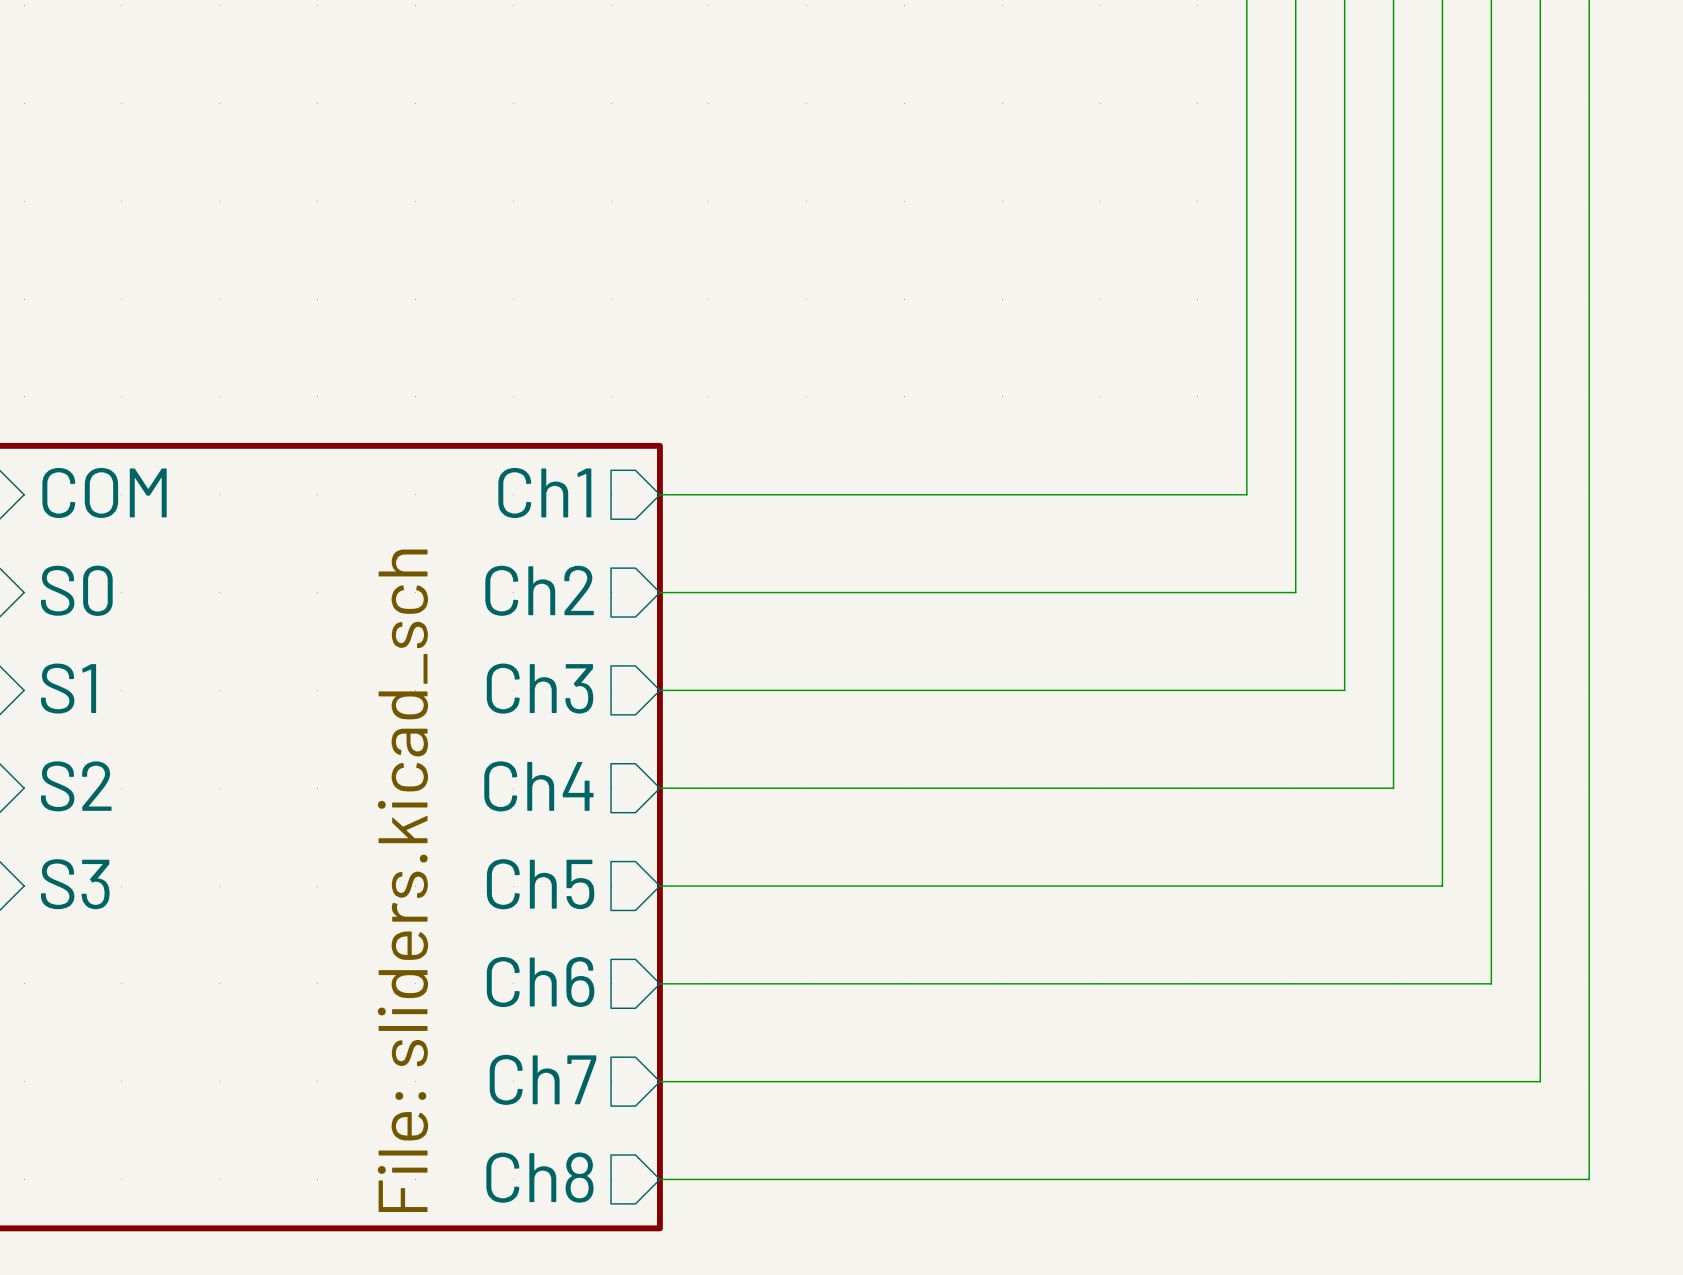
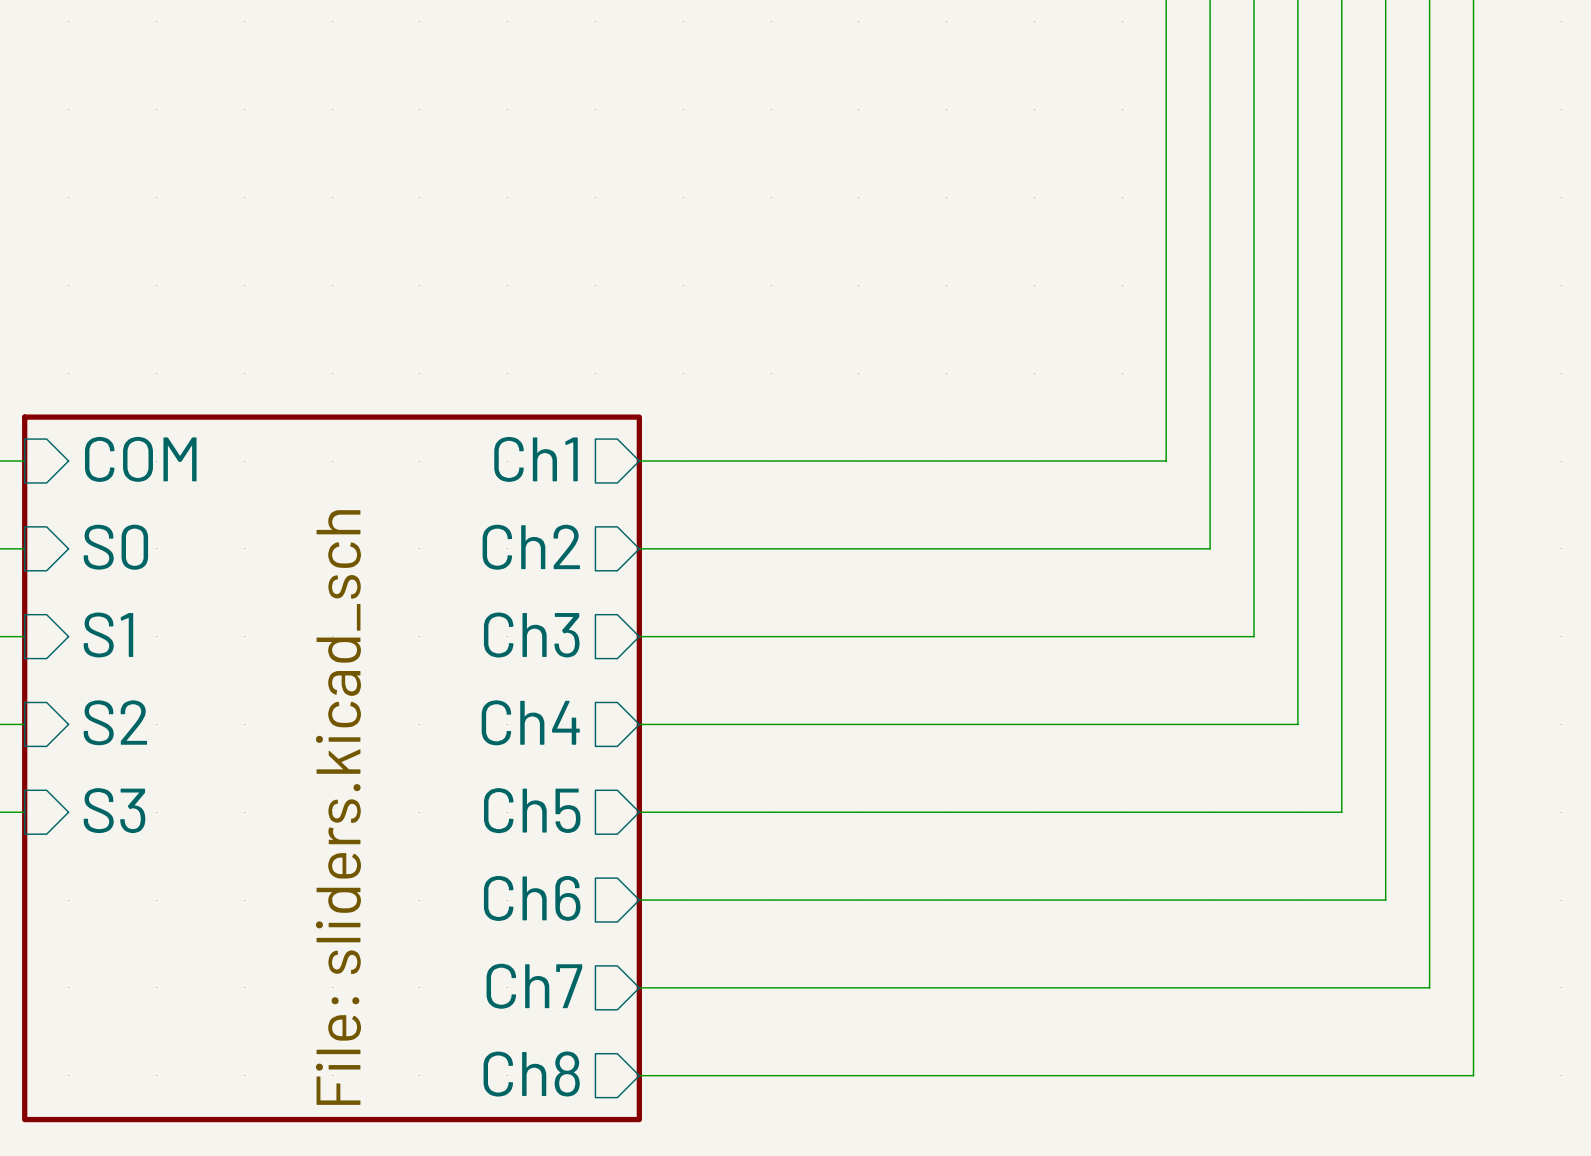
sheet value position: File: sliders.kicad_sch (403, 880) -> File: sliders.kicad_sch (338, 807)

